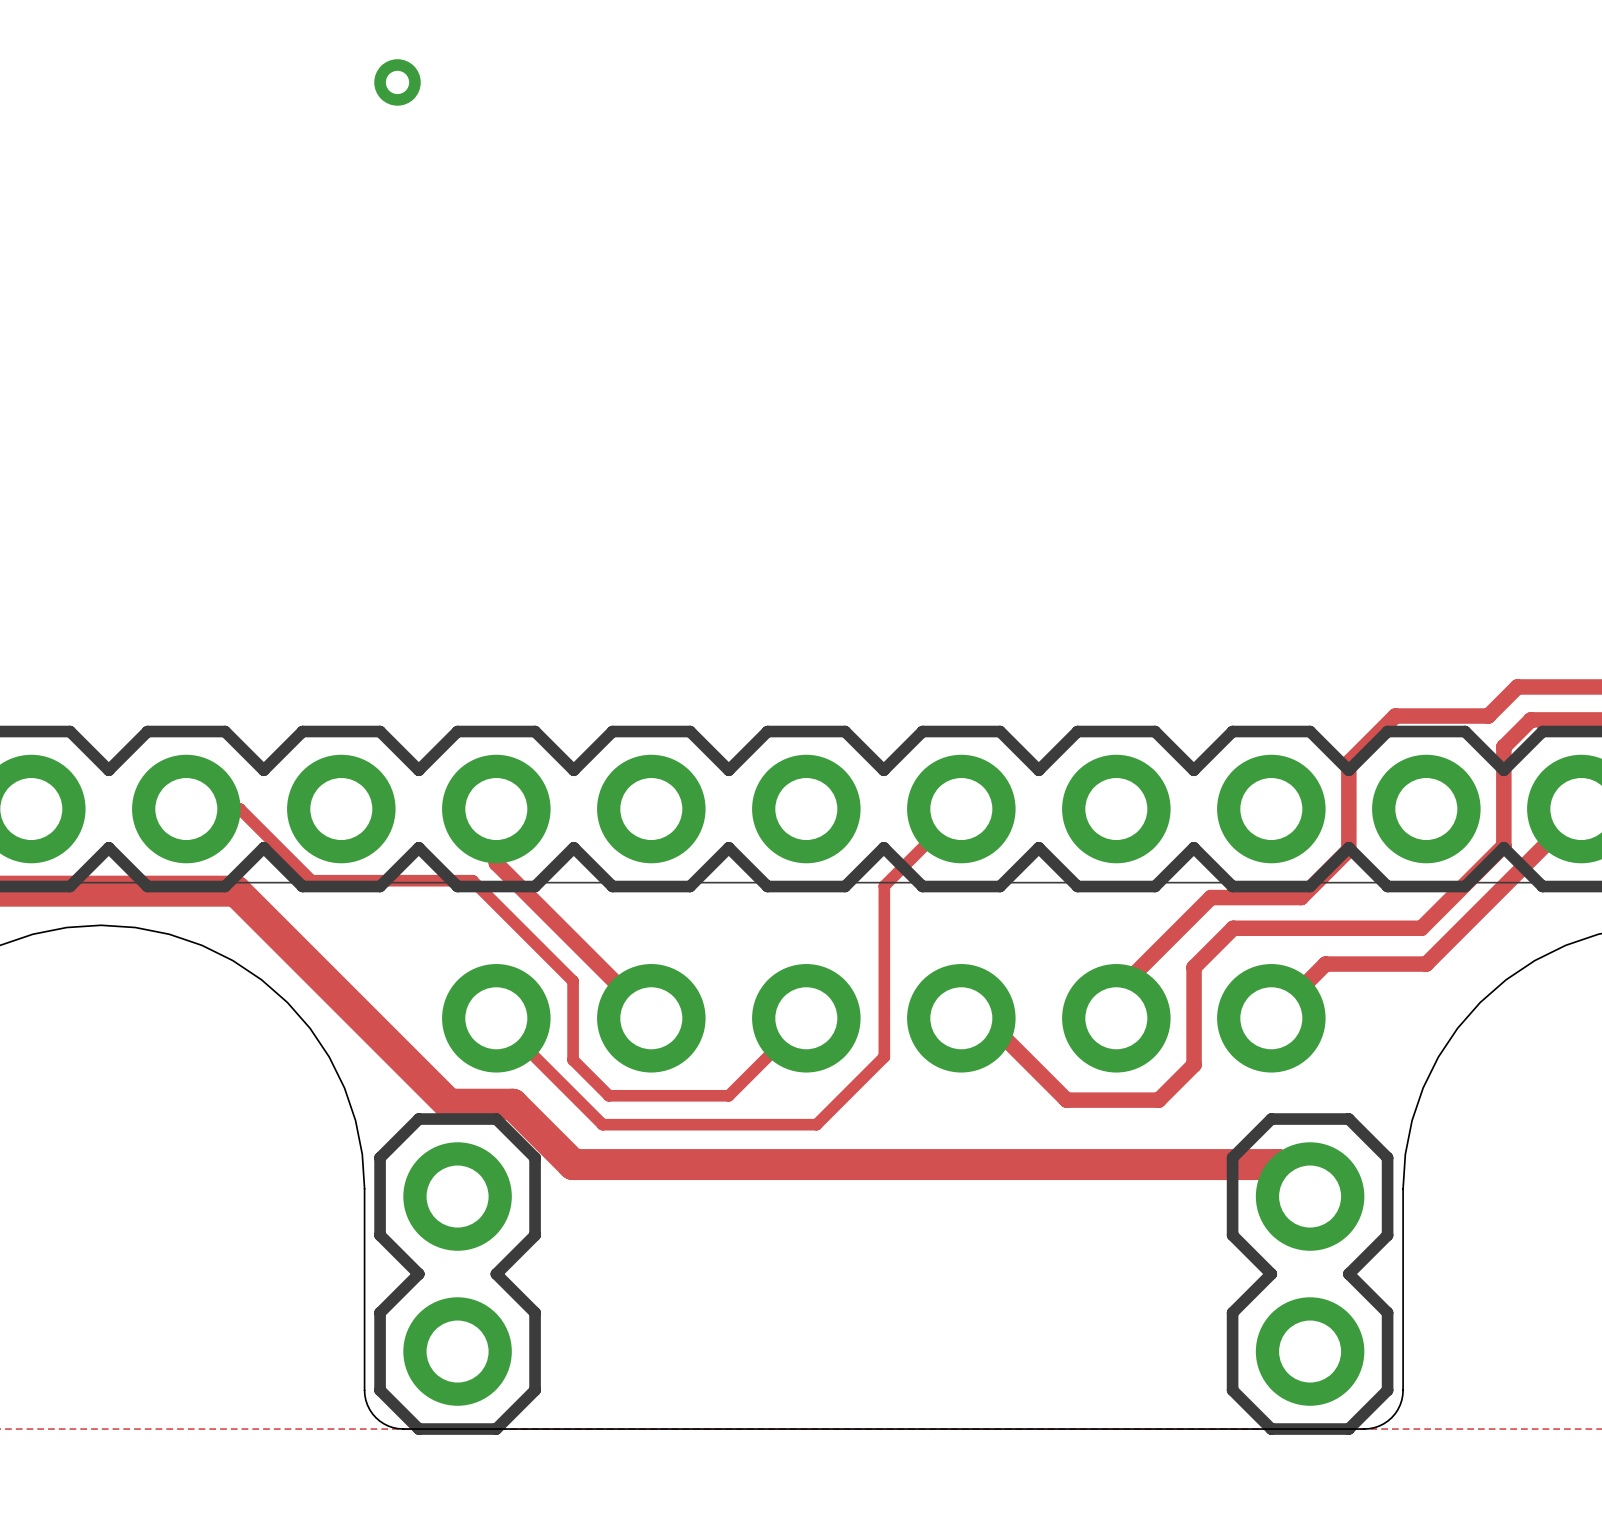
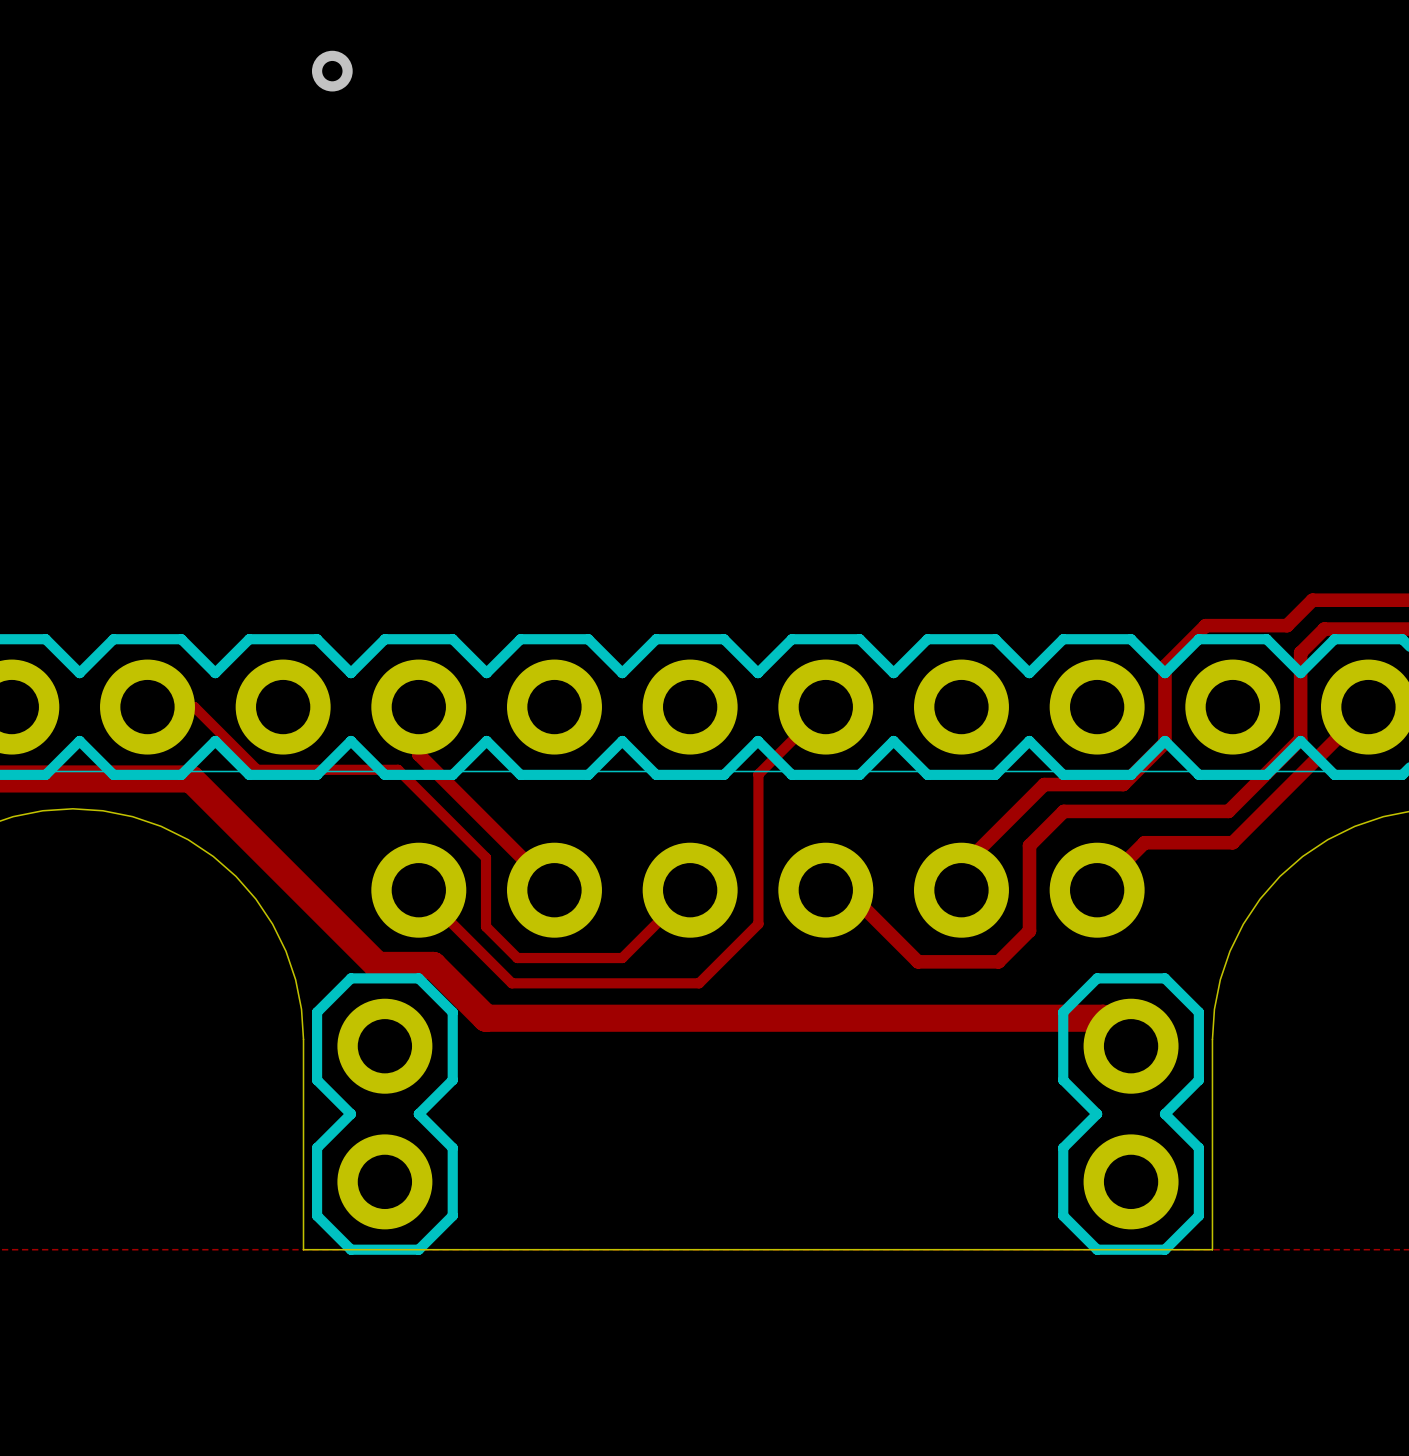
board edge: (364, 1390) (367, 1405) (375, 1417) (388, 1426) (403, 1429) -> (303, 1215) (303, 1249) (337, 1249)
board edge: (1403, 1390) (1400, 1405) (1391, 1417) (1379, 1426) (1364, 1429) -> (1212, 1215) (1212, 1249) (1178, 1249)

